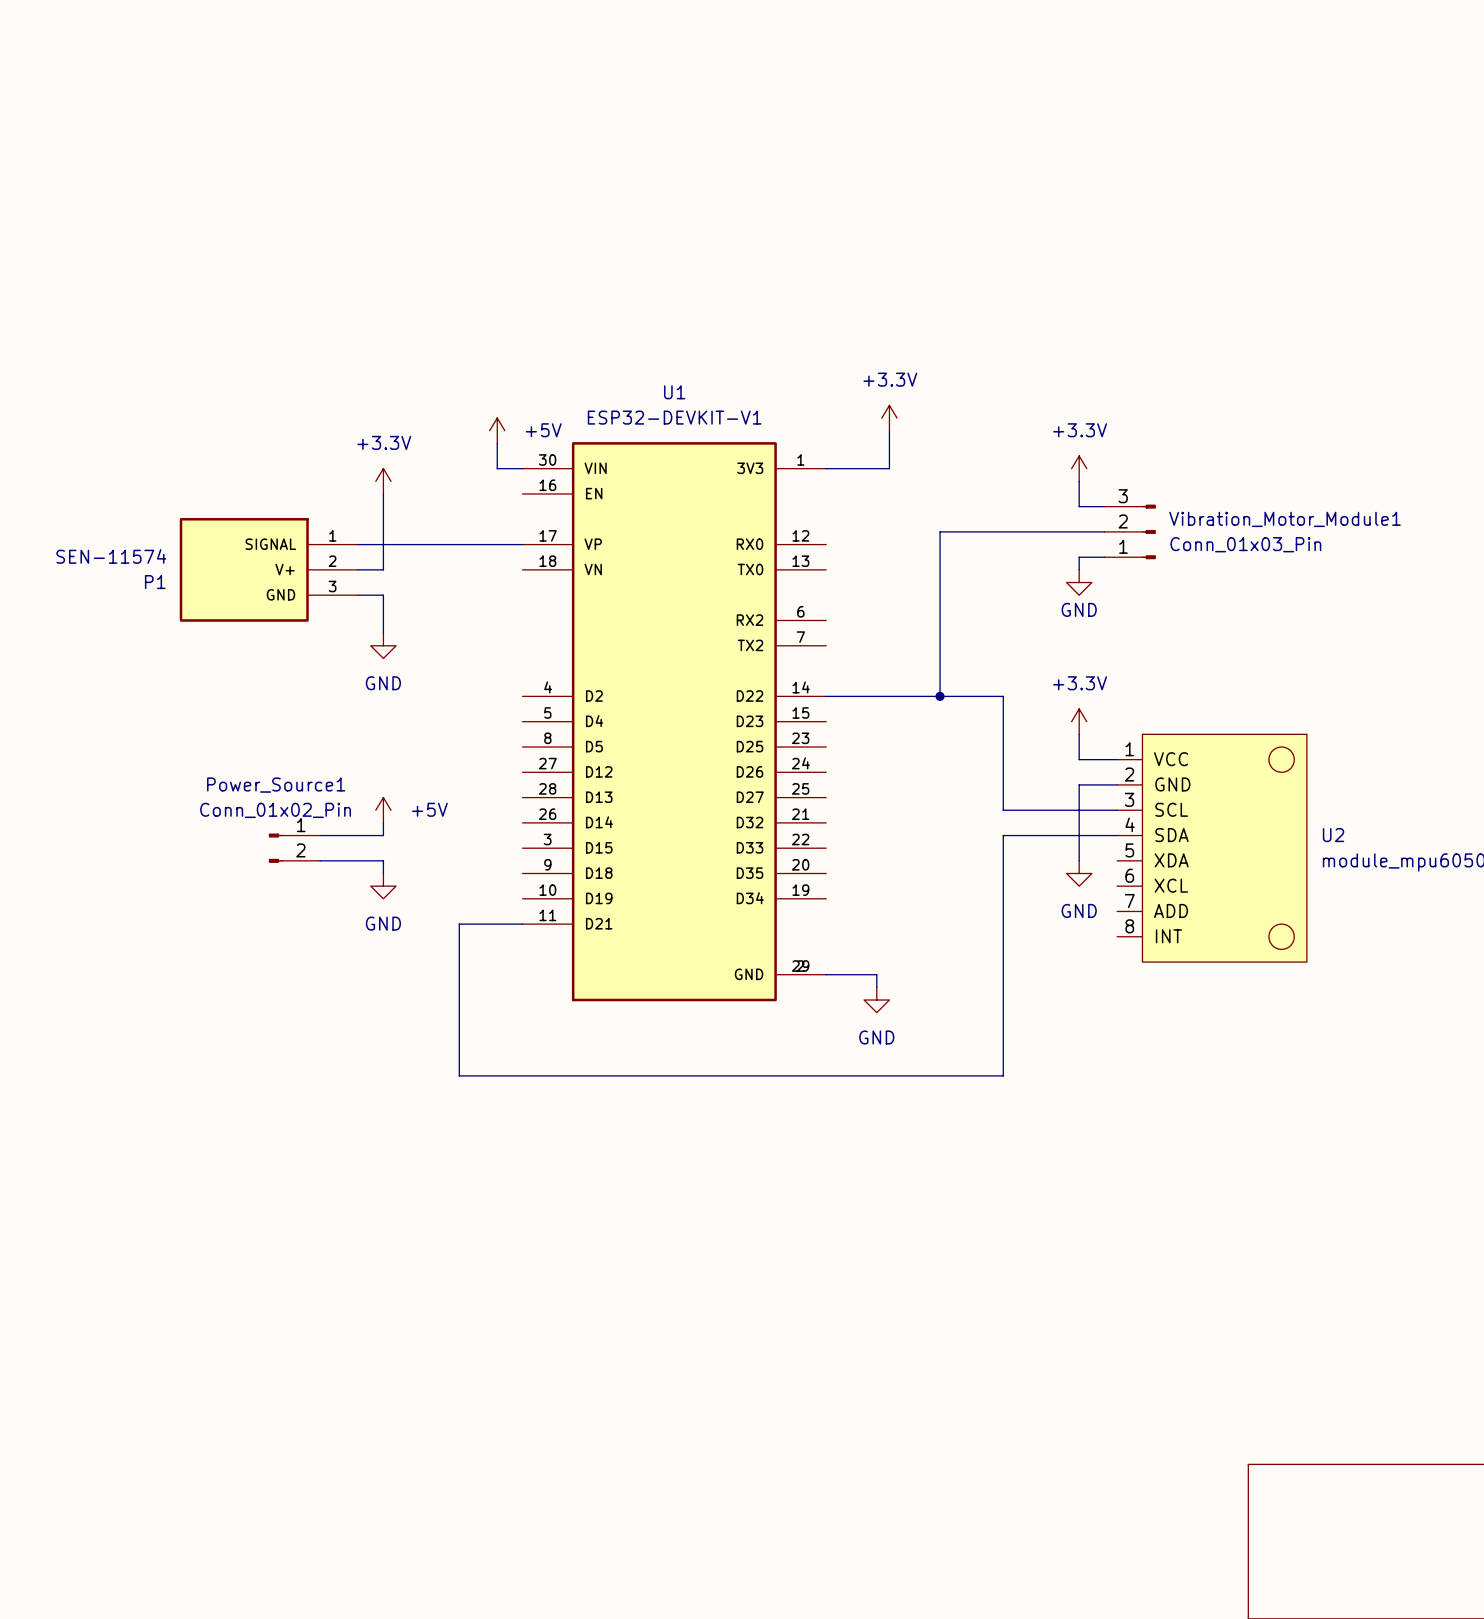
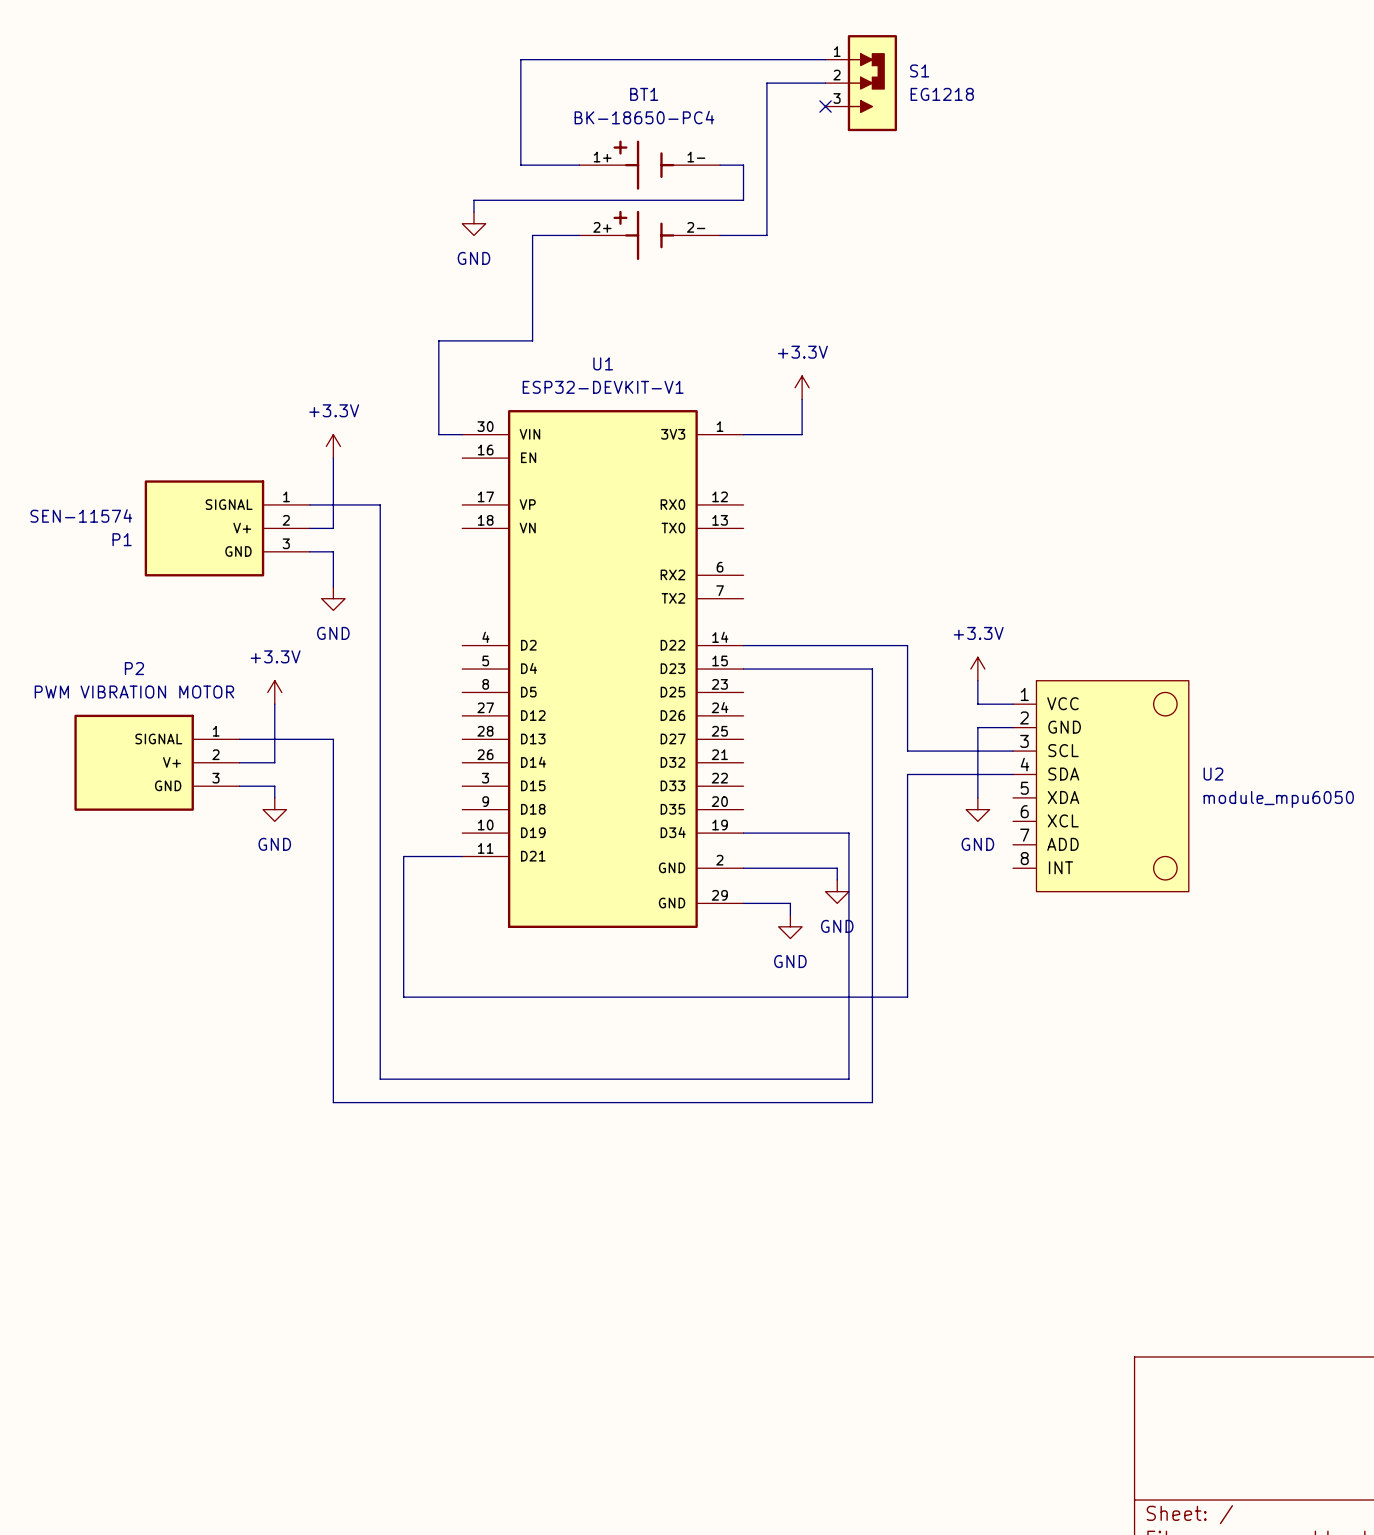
wire: none -> (825, 59) (520, 59) (520, 165) (579, 165)
wire: none -> (825, 83) (766, 83) (766, 235) (720, 235)
S1: none -> EG1218 (861, 83)
no-connect mark: none -> (825, 106)
wire: none -> (720, 165) (743, 165) (743, 200) (473, 200) (473, 212)
BT1: none -> BK-18650-PC4 (649, 200)
power symbol: none -> GND (473, 223)
wire: none -> (579, 235) (532, 235) (532, 340) (438, 340) (438, 411)
power symbol: +5V (497, 430) -> none
U1 symbol: [522, 442, 827, 1002] -> [462, 410, 744, 928]
power symbol: +3.3V (1079, 468) -> none
wire: (1079, 481) (1079, 506) (1104, 506) -> none
wire: (1104, 531) (940, 531) (940, 696) -> none
Vibration_Motor_Module1: Conn_01x03_Pin (1130, 531) -> none
wire: (434, 544) (522, 544) -> (380, 504) (380, 1079) (848, 1079) (848, 833) (743, 833)
wire: (1104, 557) (1079, 557) (1079, 569) -> none
power symbol: GND (1079, 582) -> none
junction: (940, 696) -> none
wire: none -> (743, 669) (872, 669) (872, 1102) (333, 1102) (333, 809)
power symbol: none -> +3.3V (274, 692)
wire: none -> (274, 704) (274, 762) (239, 762)
wire: none -> (239, 739) (333, 739) (333, 762)
power symbol: +5V (383, 810) -> none
P2: none -> PWM VIBRATION MOTOR (157, 762)
wire: (320, 835) (383, 835) -> (333, 797) (333, 774)
Power_Source1: Conn_01x02_Pin (294, 848) -> none
wire: (320, 860) (383, 860) -> (274, 797) (274, 786) (239, 786)
power symbol position: GND (383, 886) -> GND (274, 809)
wire: none -> (743, 868) (837, 868) (837, 879)
power symbol: none -> GND (837, 891)

